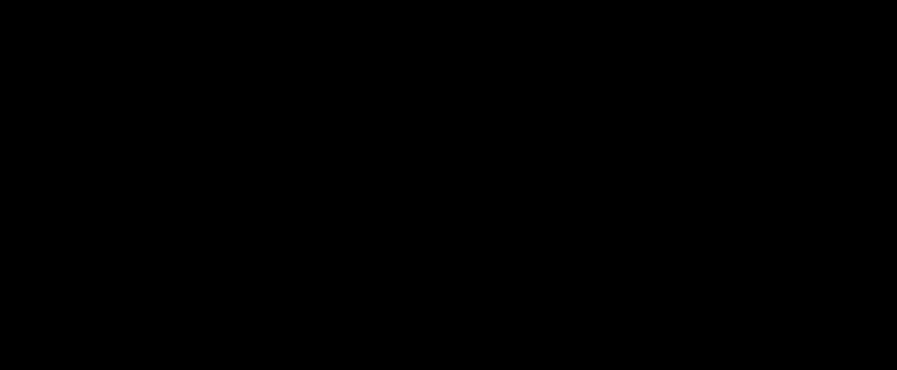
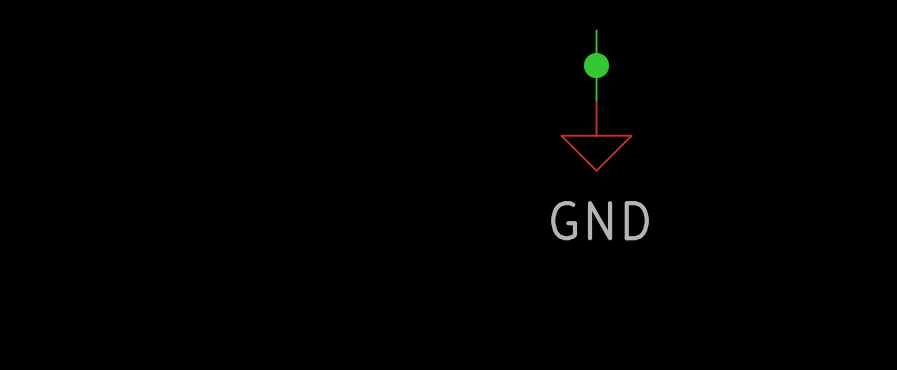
wire: none -> (596, 30) (596, 100)
junction: none -> (596, 65)
power symbol: none -> GND (596, 135)

